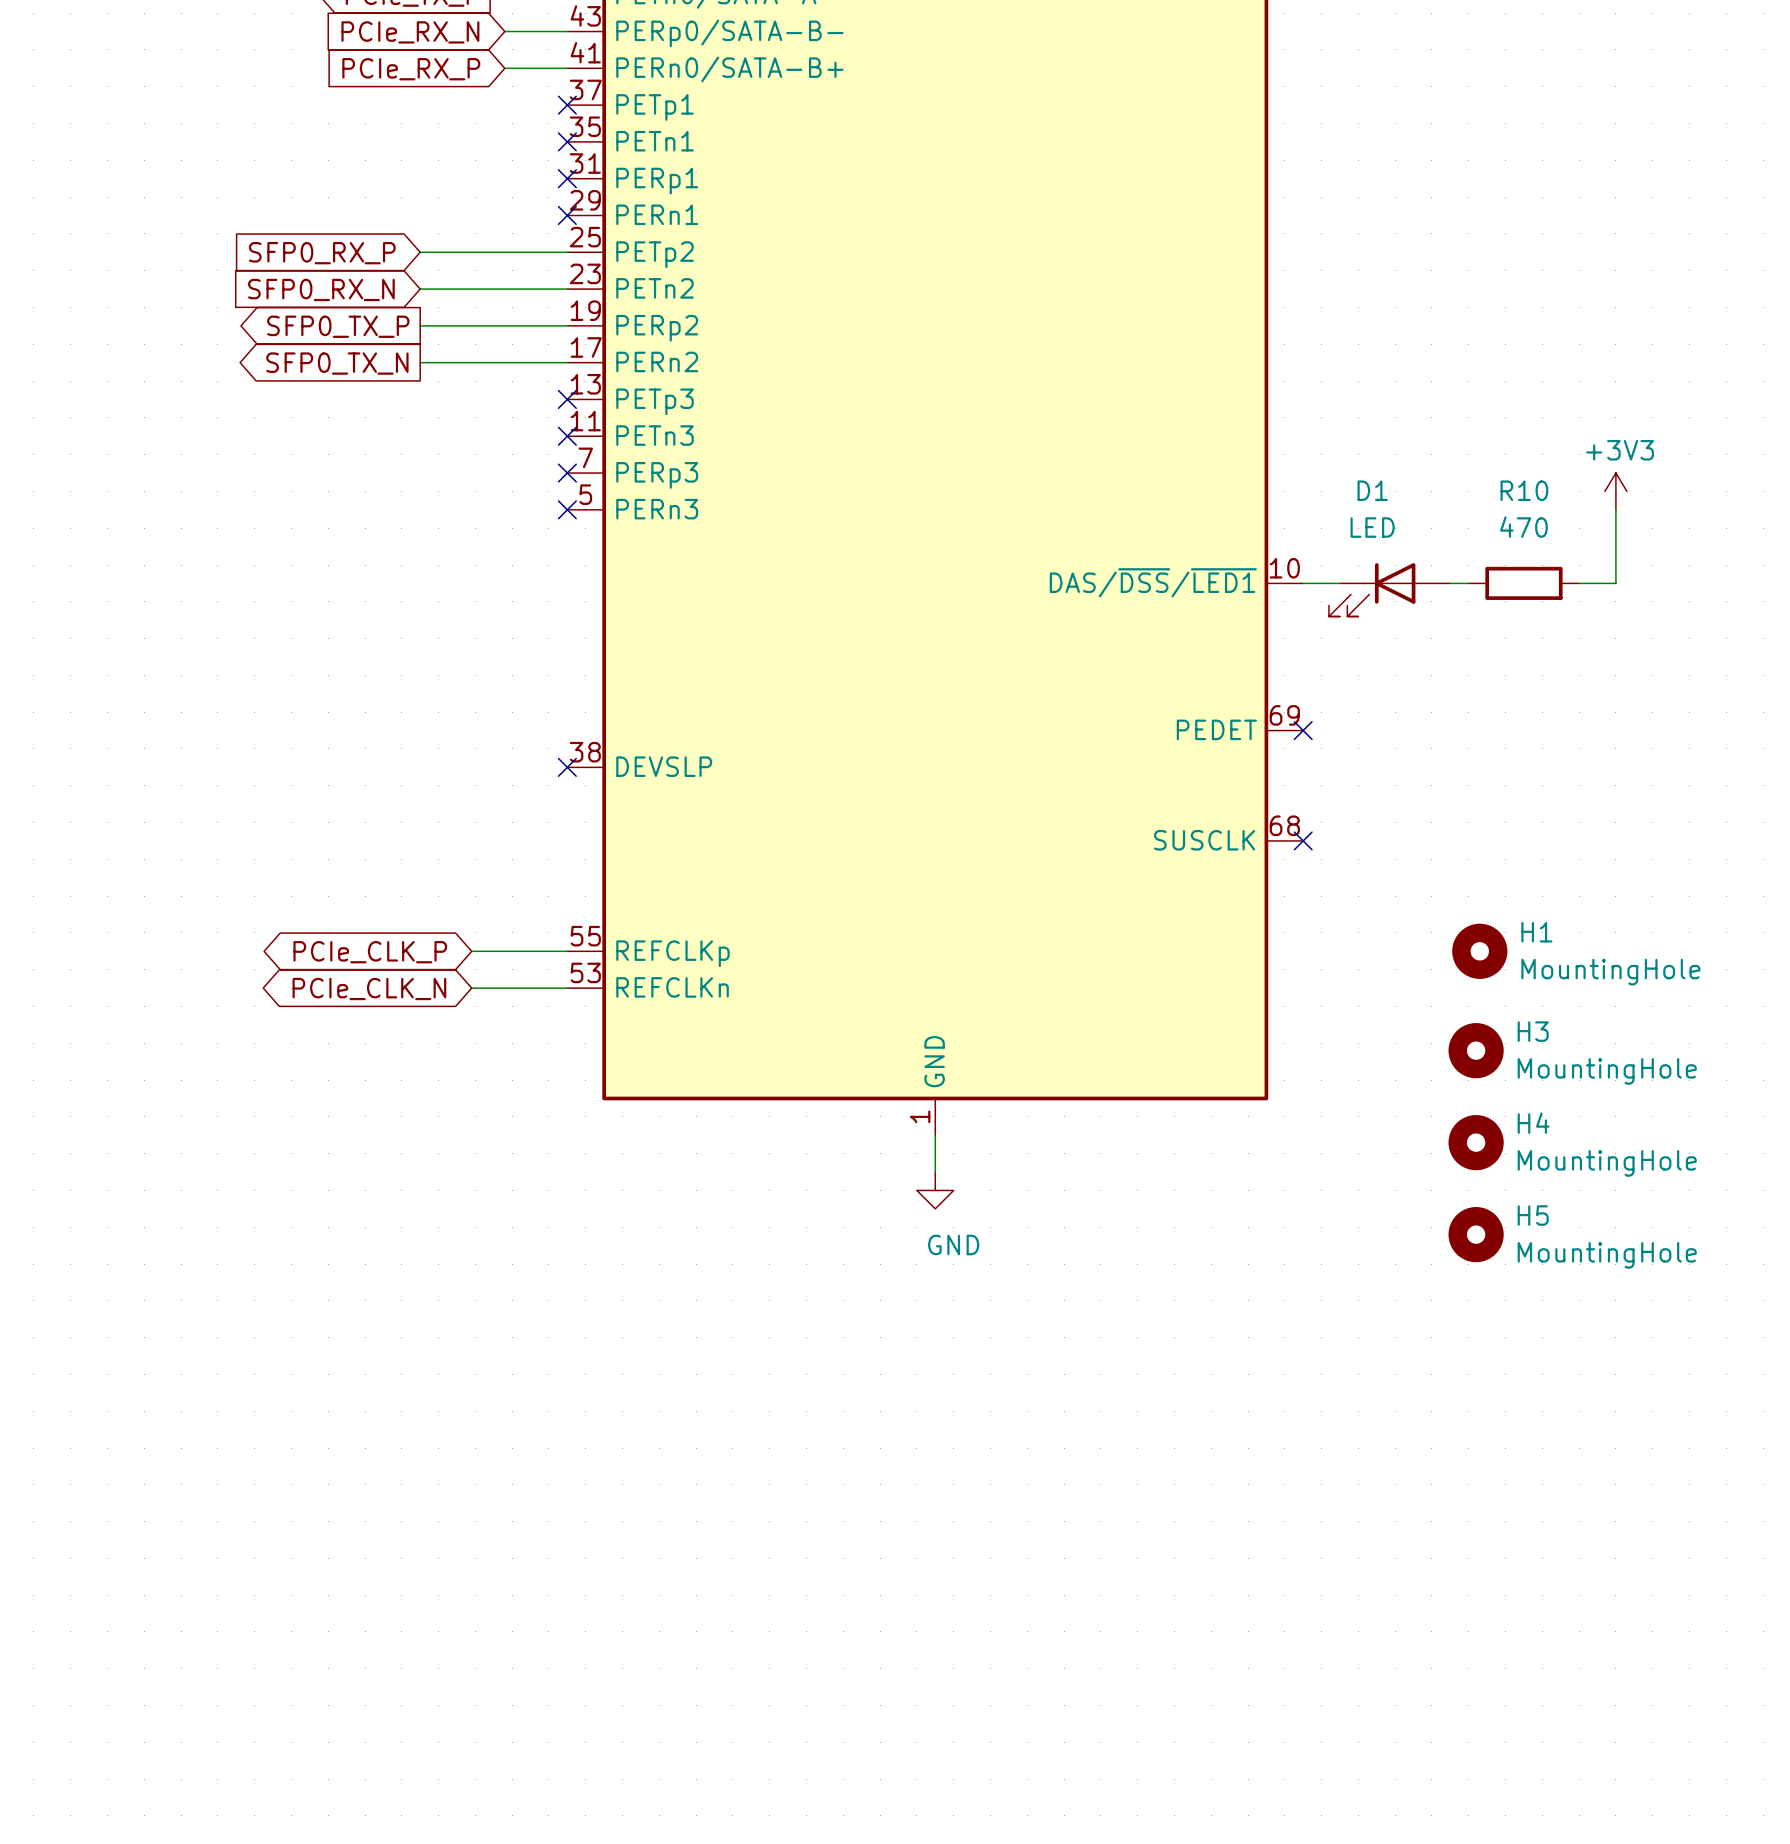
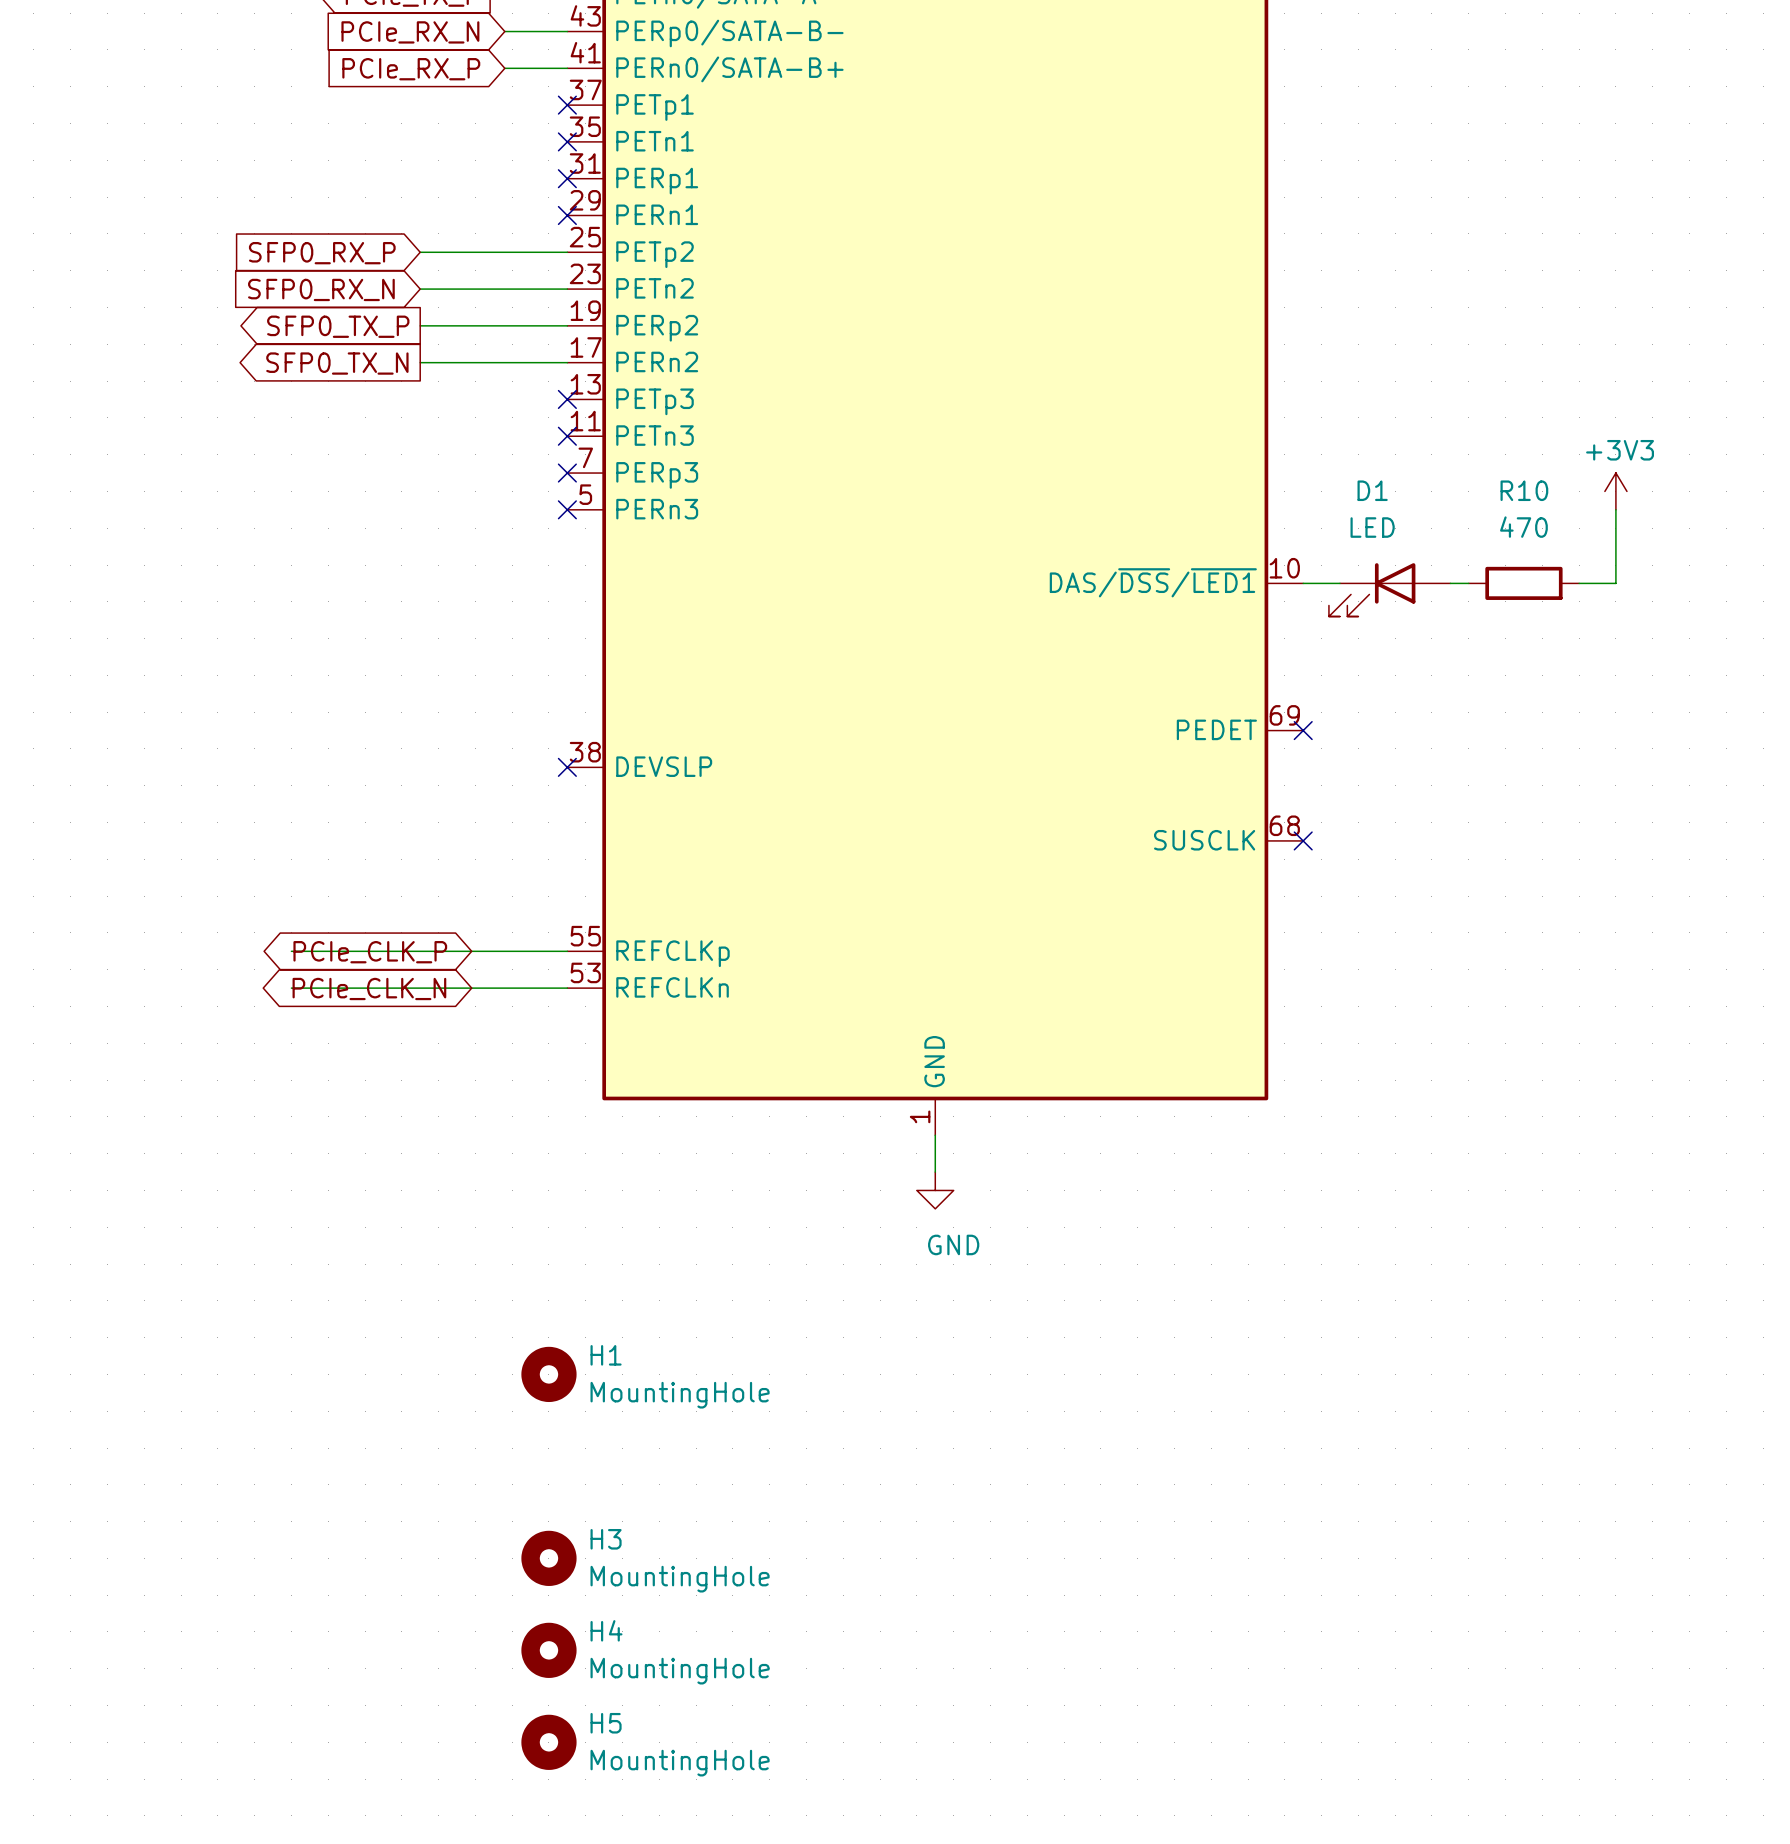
wire: none -> (291, 951) (471, 951)
H1 position: (1479, 951) -> (548, 1374)
wire: none -> (291, 988) (471, 988)
H3 position: (1476, 1050) -> (548, 1558)
H4 position: (1476, 1142) -> (548, 1650)
H5 position: (1476, 1234) -> (548, 1742)

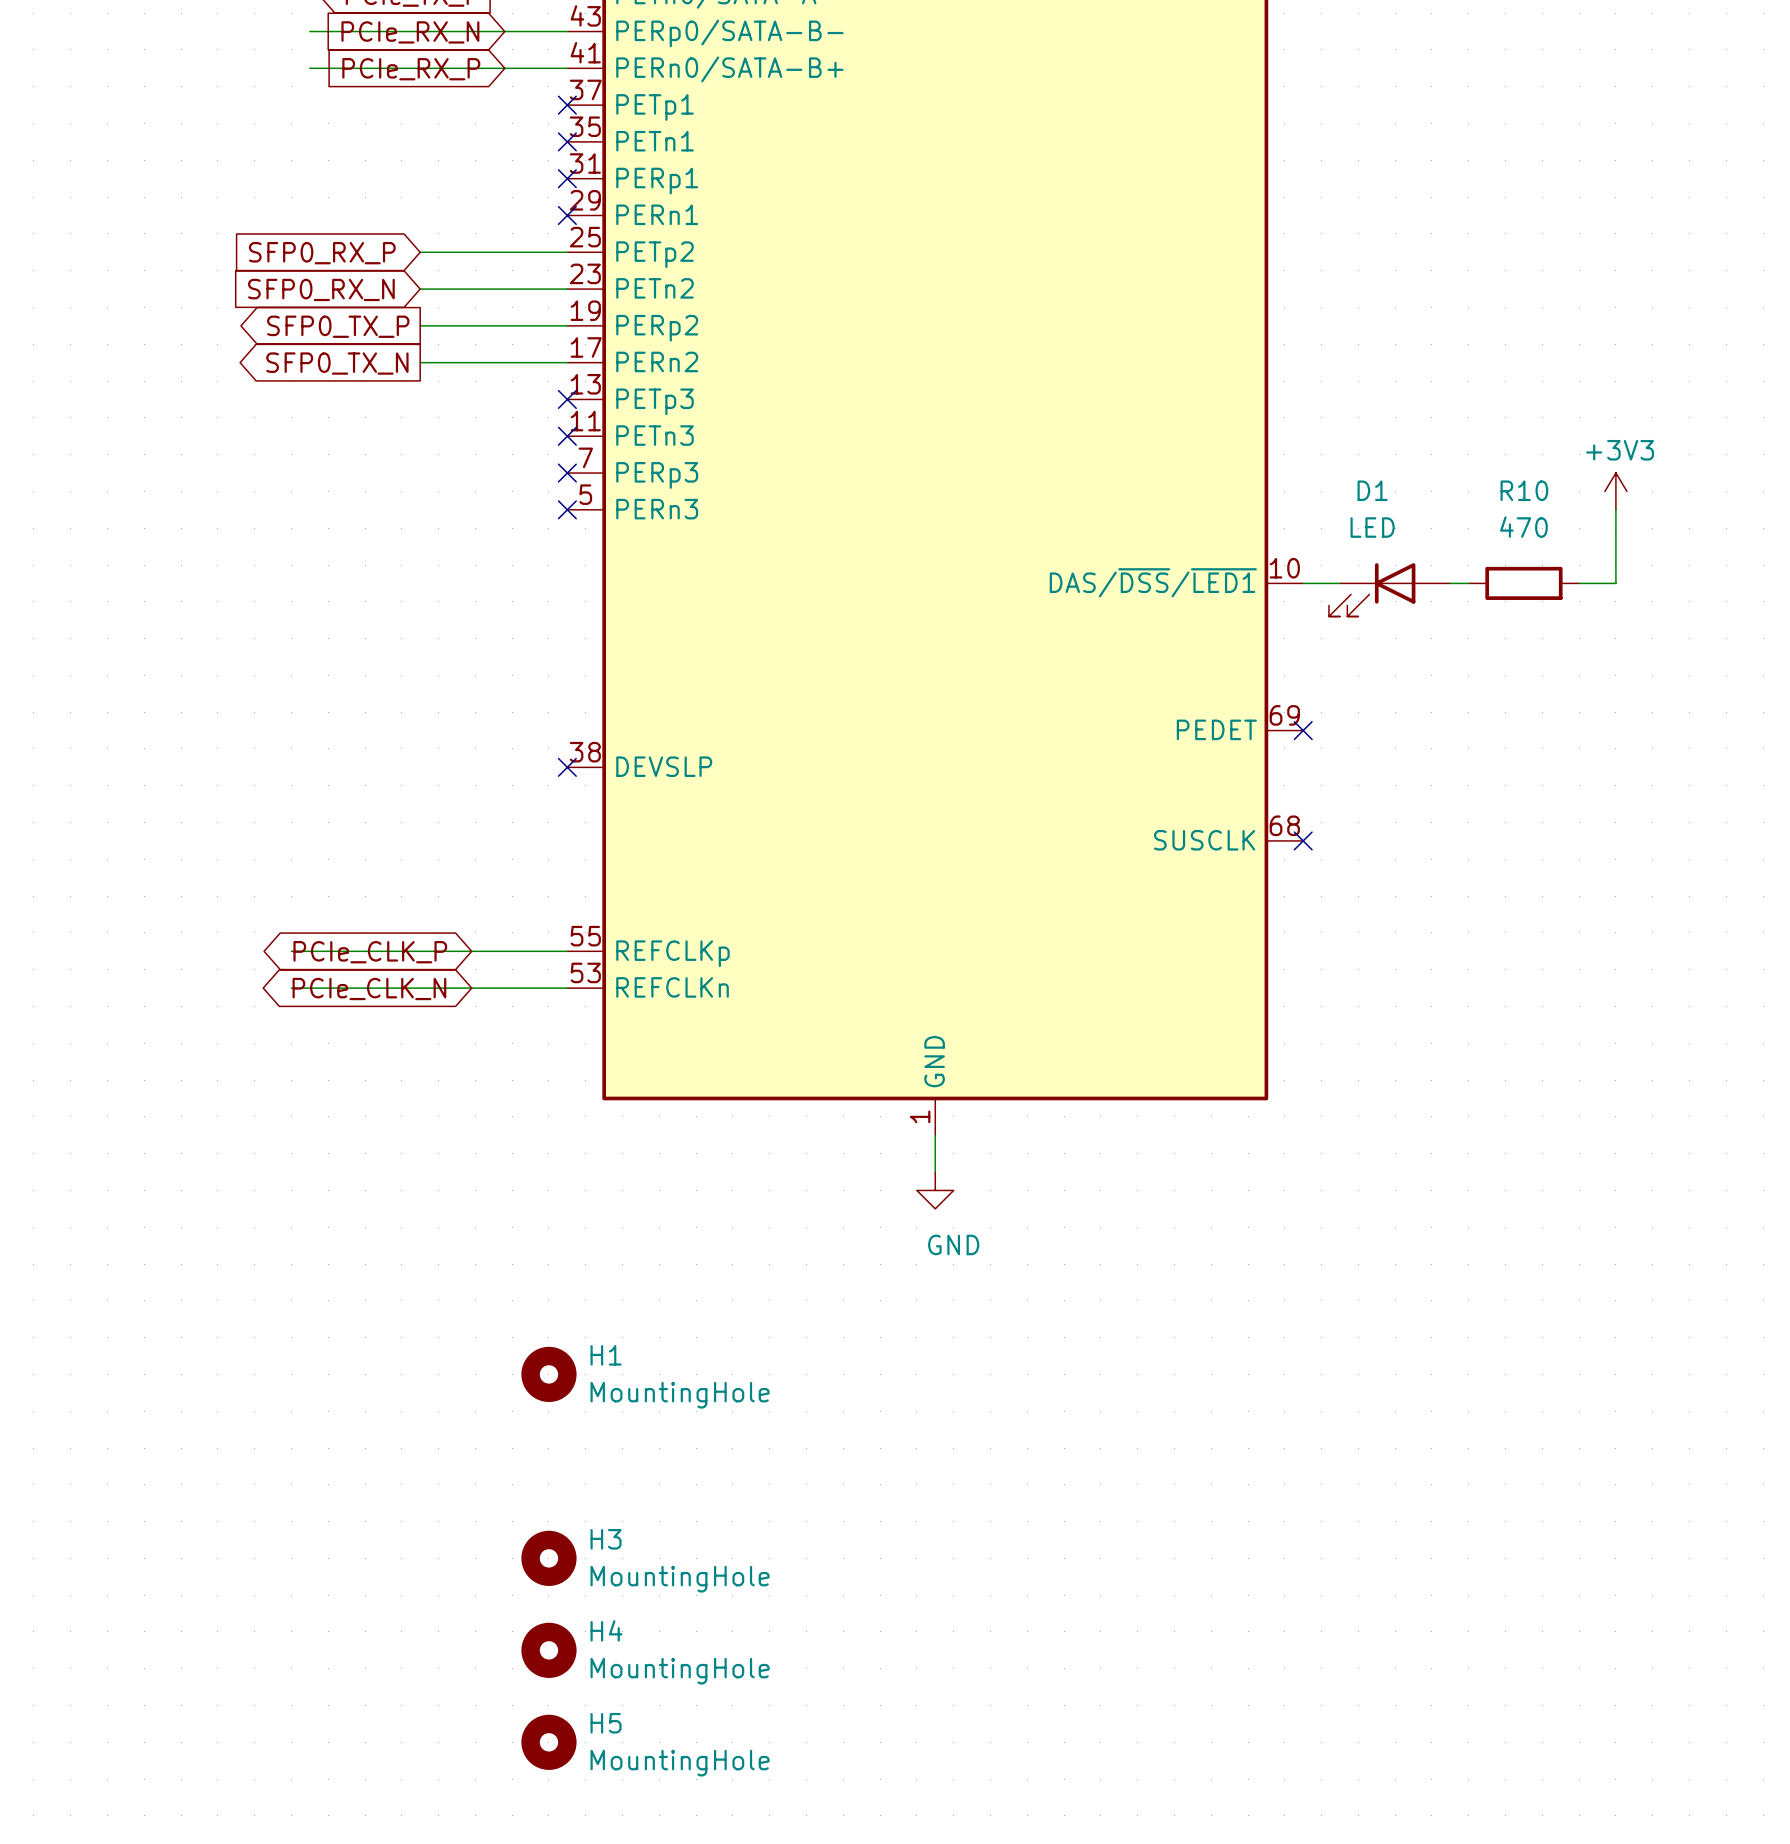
wire: none -> (309, 31) (504, 31)
wire: none -> (309, 68) (504, 68)

